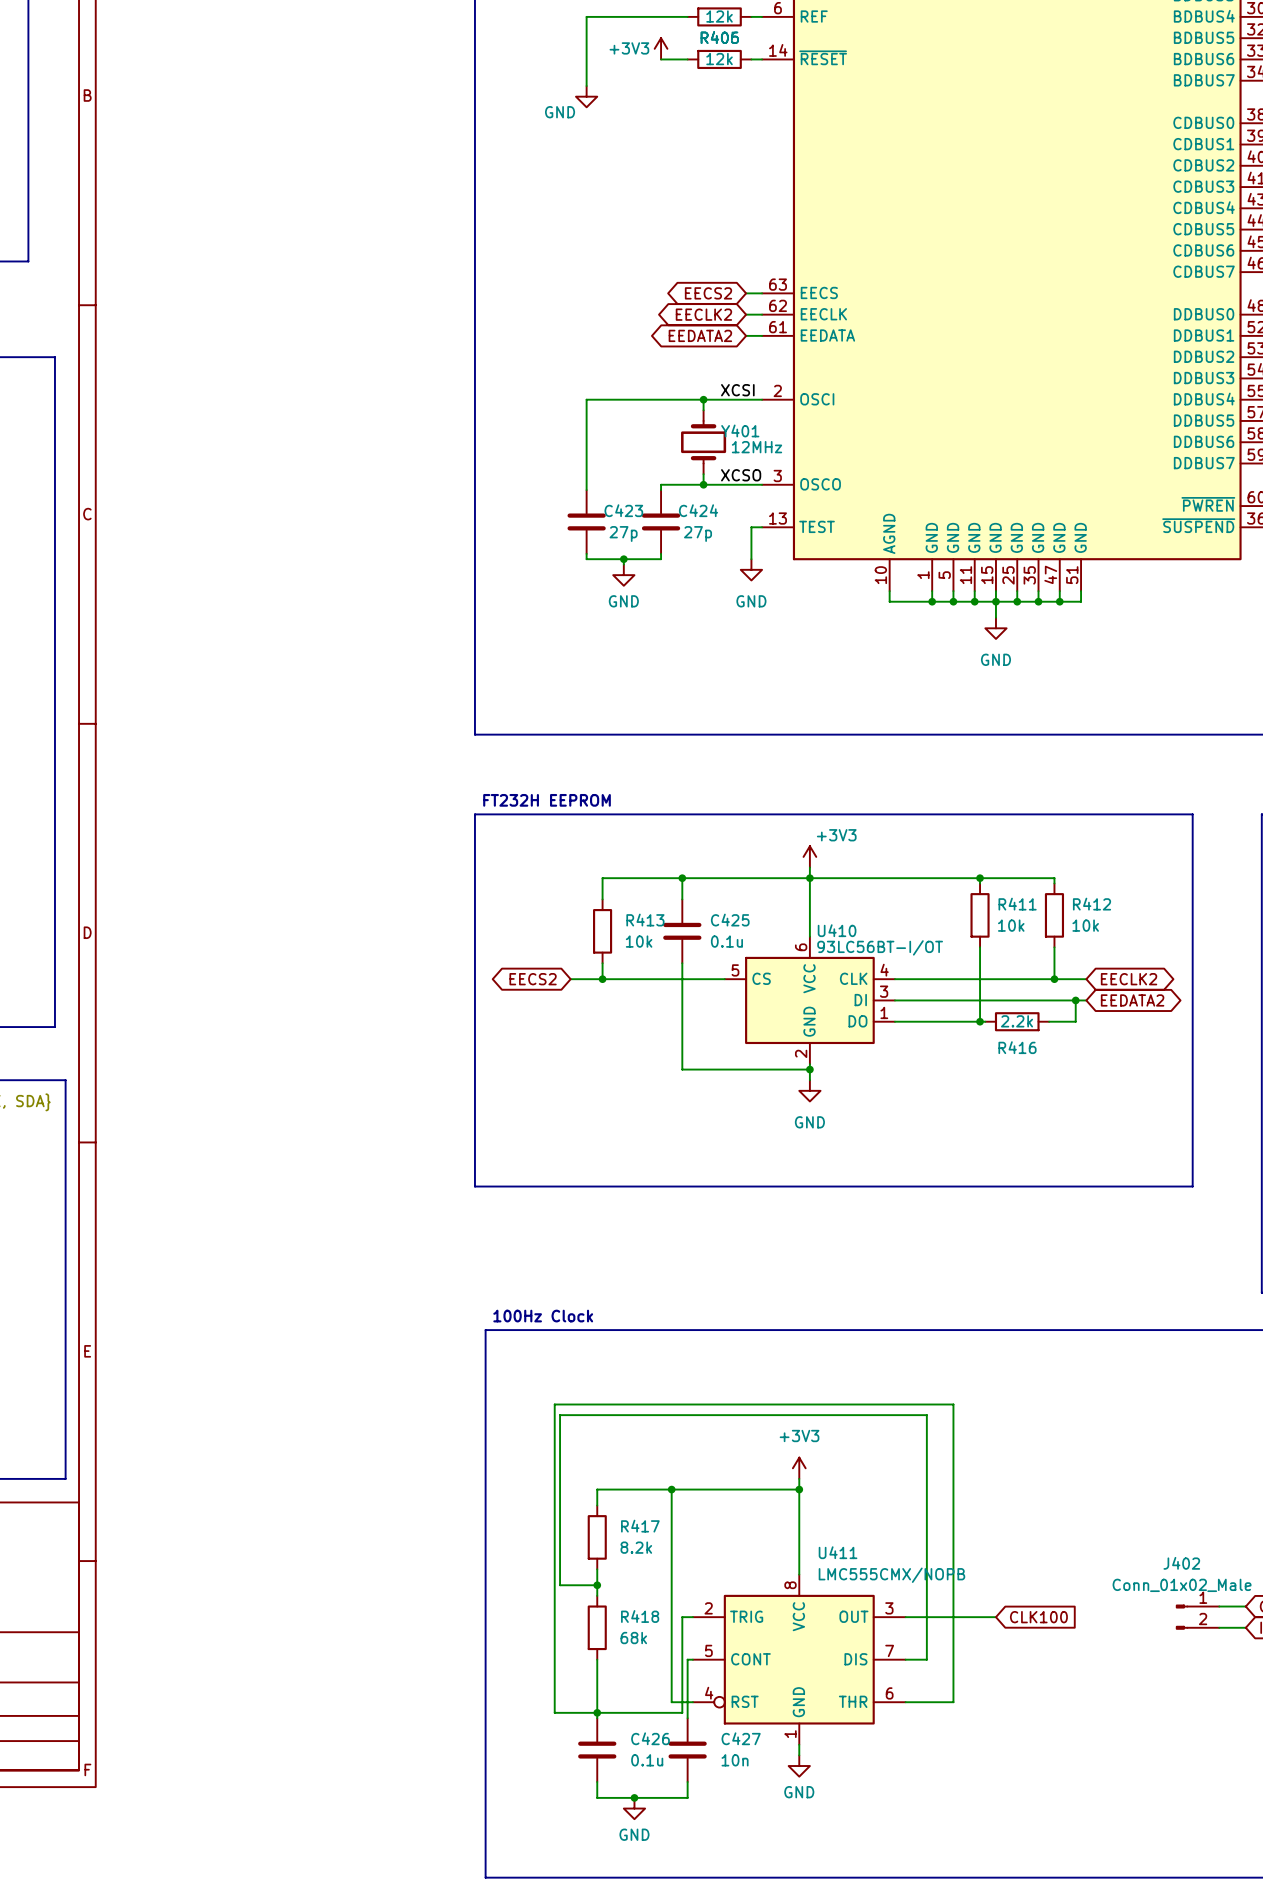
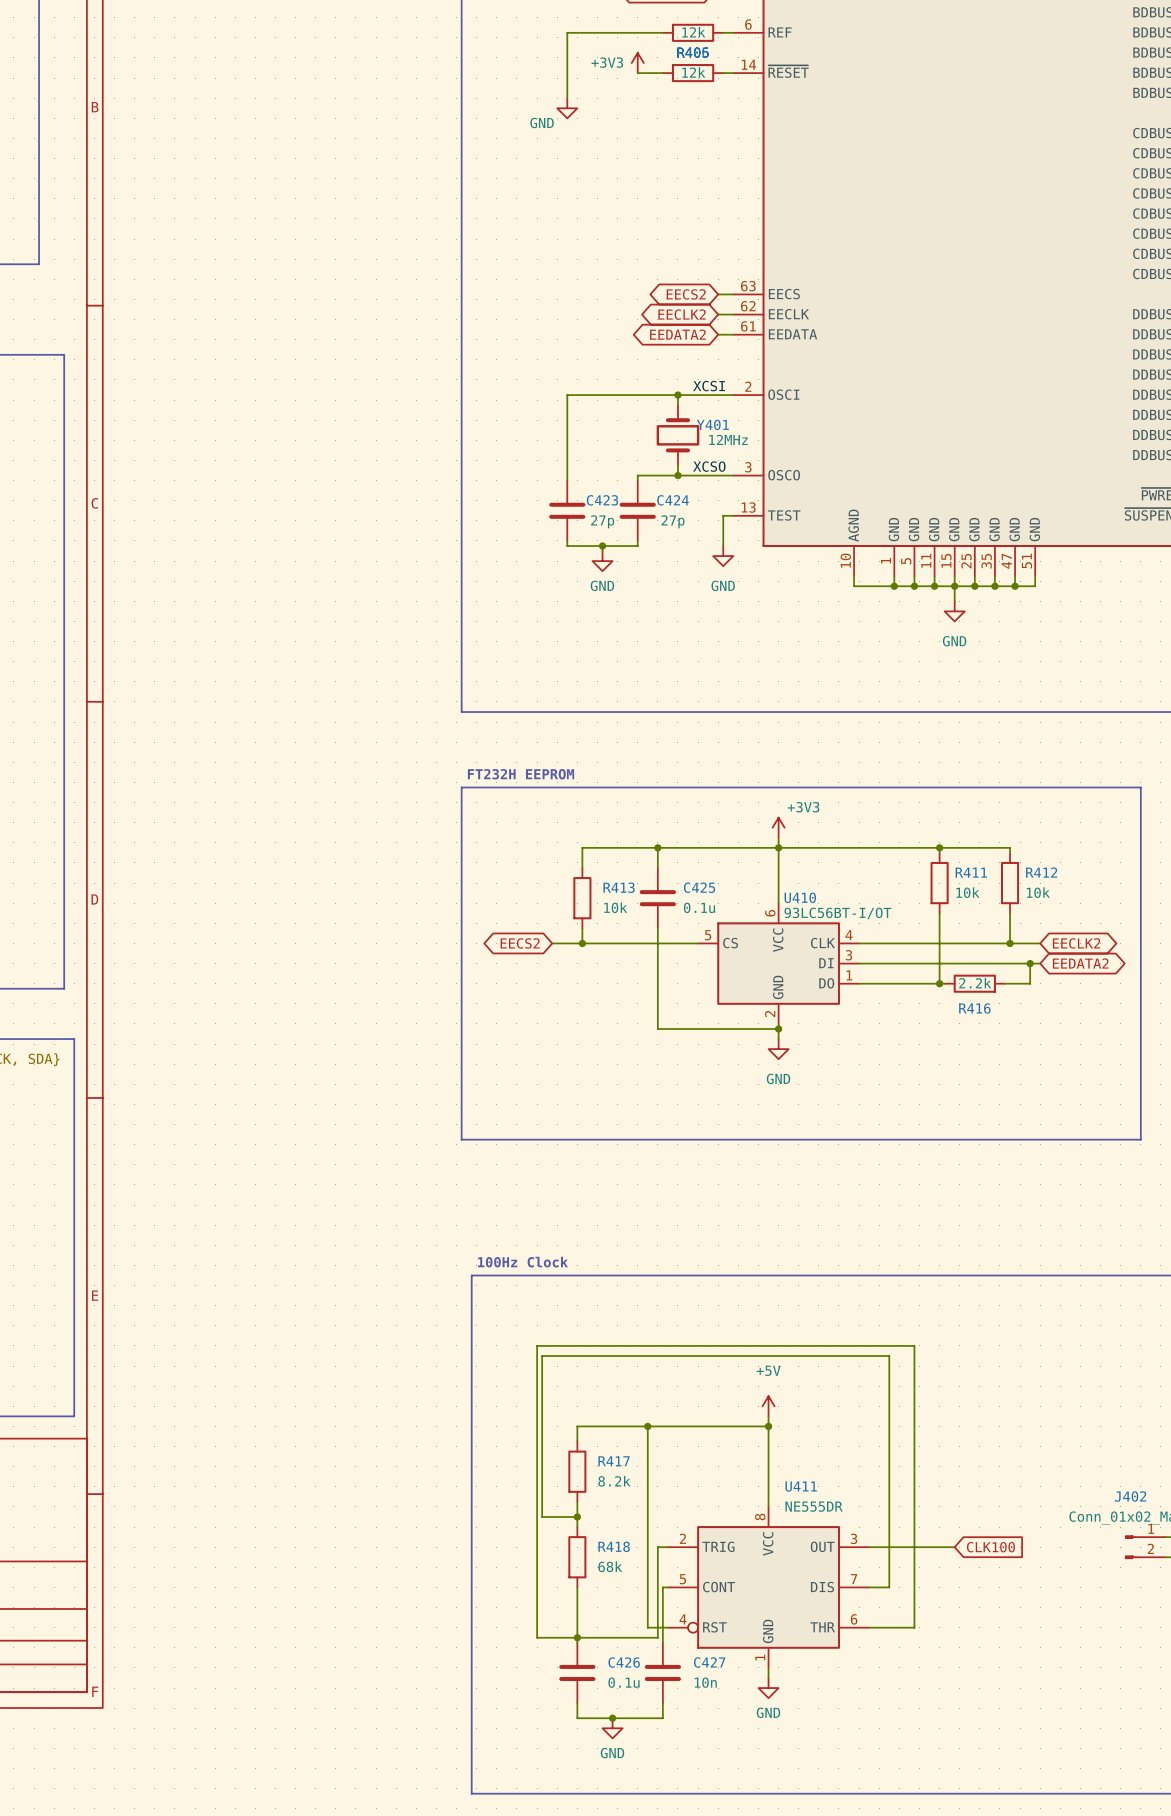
power symbol: +3V3 (799, 1468) -> +5V (768, 1406)
U411 value: LMC555CMX/NOPB (891, 1575) -> NE555DR (814, 1506)

